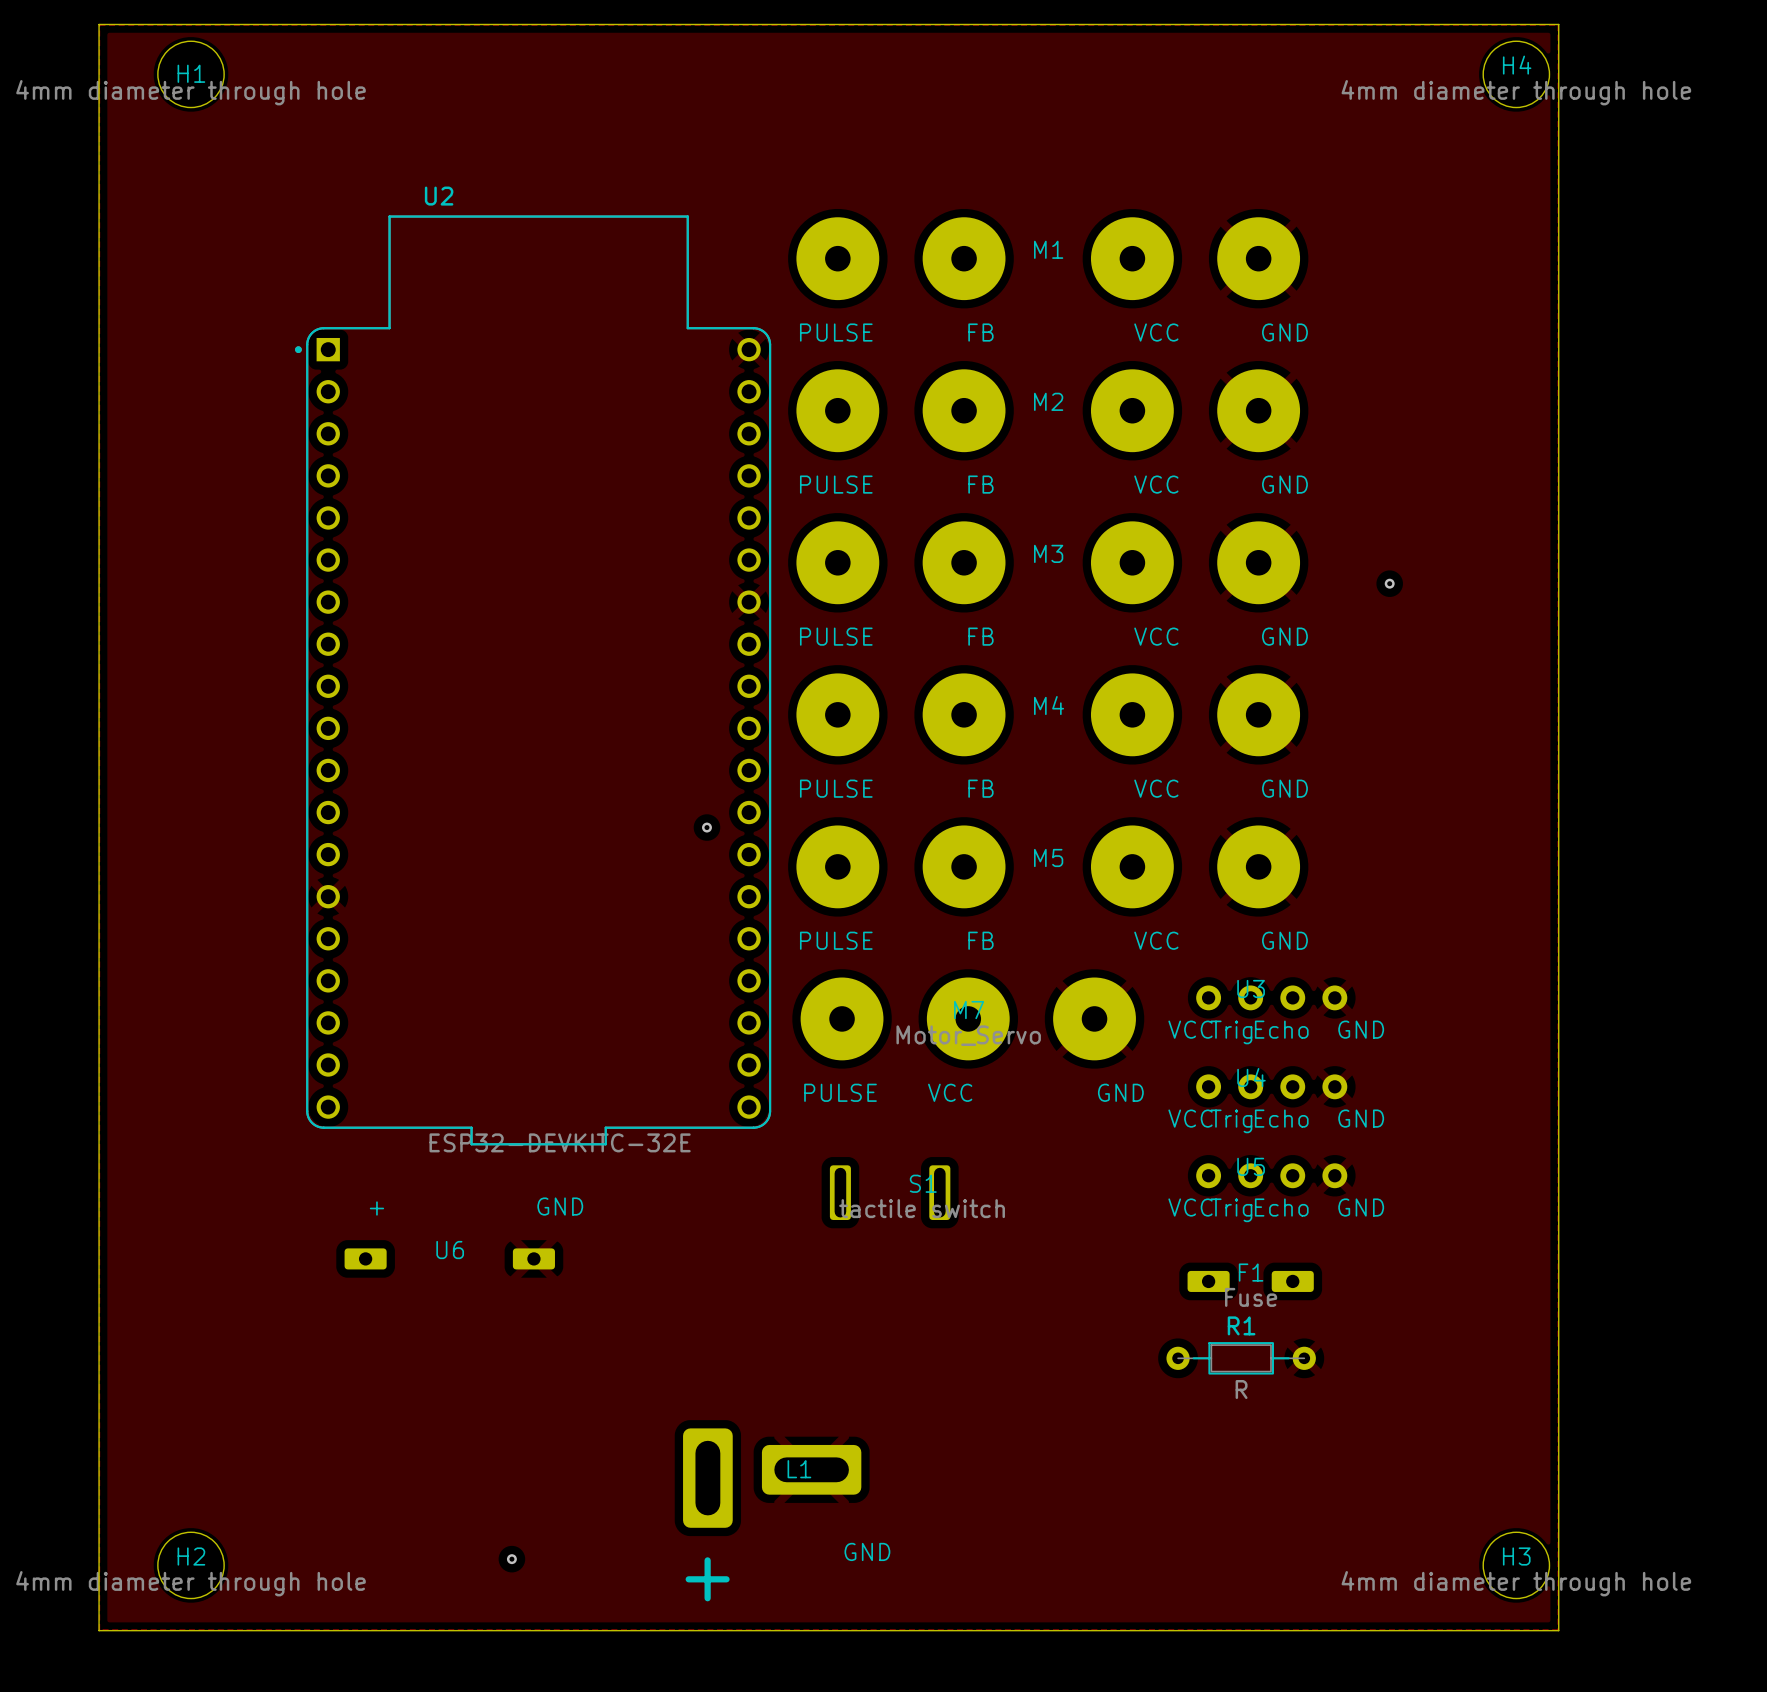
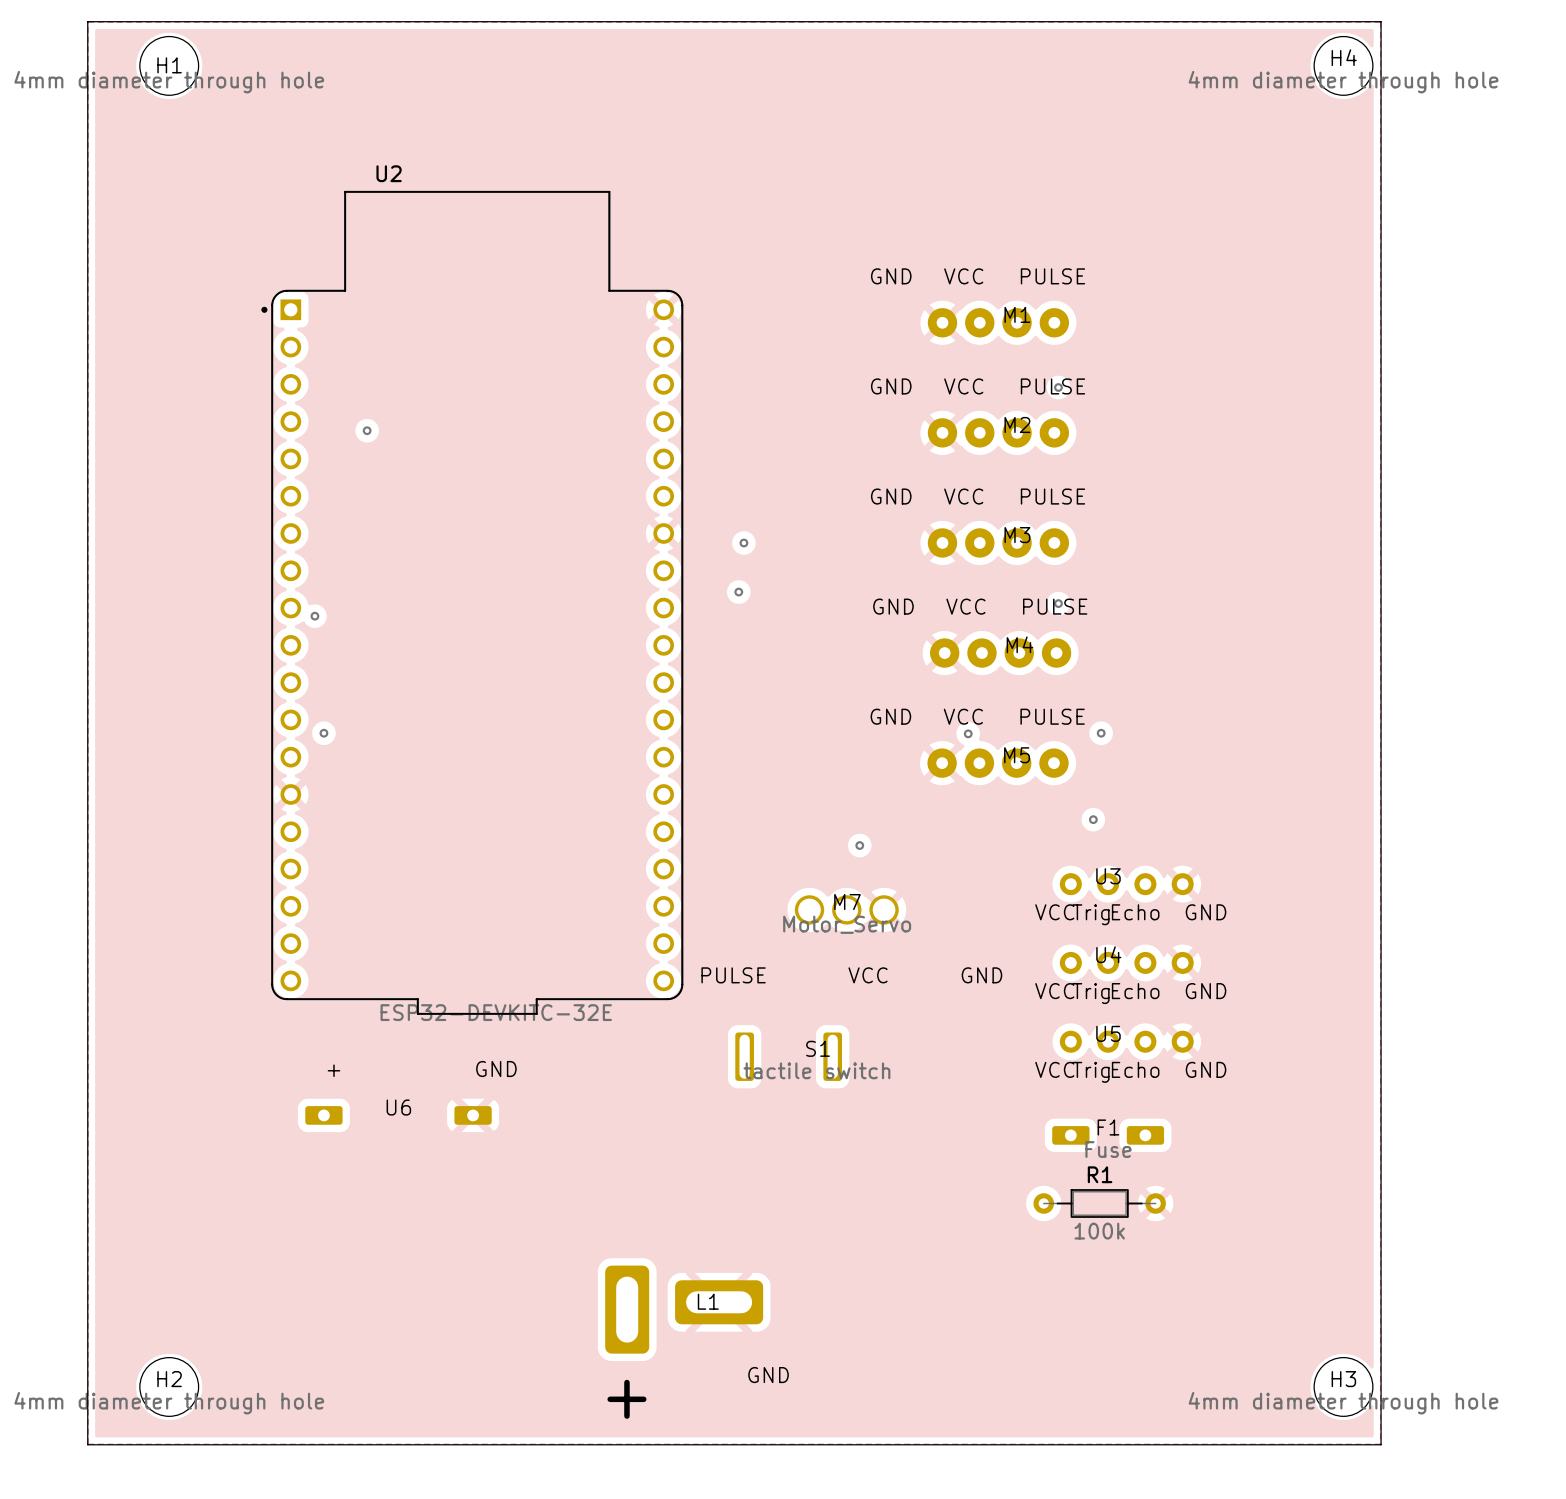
M1 footprint: [796, 217, 1301, 301] -> [927, 308, 1070, 338]
M2 footprint: [796, 369, 1301, 453] -> [927, 418, 1070, 448]
via: none -> (1058, 387)
via: none -> (367, 430)
M3 footprint: [796, 521, 1301, 605] -> [927, 528, 1070, 558]
via: (1389, 583) -> none
via: none -> (743, 543)
via: none -> (738, 592)
M4 footprint: [796, 673, 1301, 757] -> [930, 638, 1072, 668]
via: none -> (1058, 603)
via: none -> (314, 616)
M5 footprint: [796, 825, 1301, 909] -> [927, 748, 1069, 778]
via: none -> (323, 733)
via: (706, 827) -> none
via: none -> (1101, 733)
via: none -> (968, 733)
via: none -> (1093, 819)
via: none -> (859, 845)
M7 footprint: [800, 977, 1136, 1061] -> [794, 895, 899, 925]
R1 value: R (1241, 1389) -> 100k (1099, 1231)
via: (511, 1559) -> none

